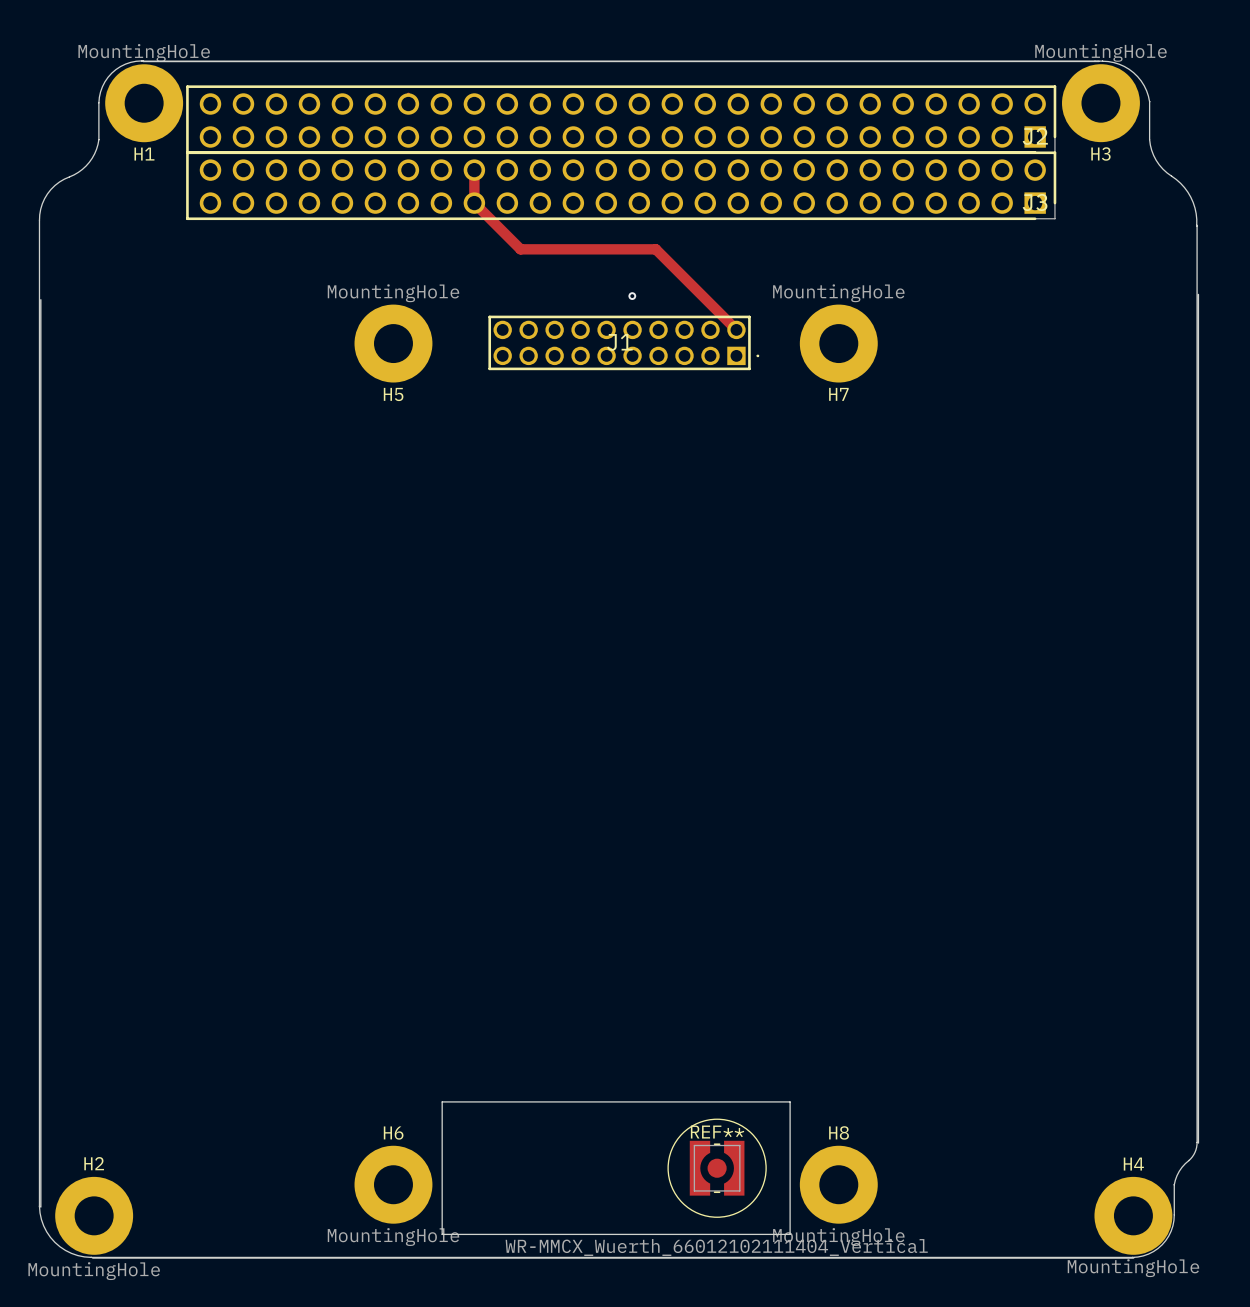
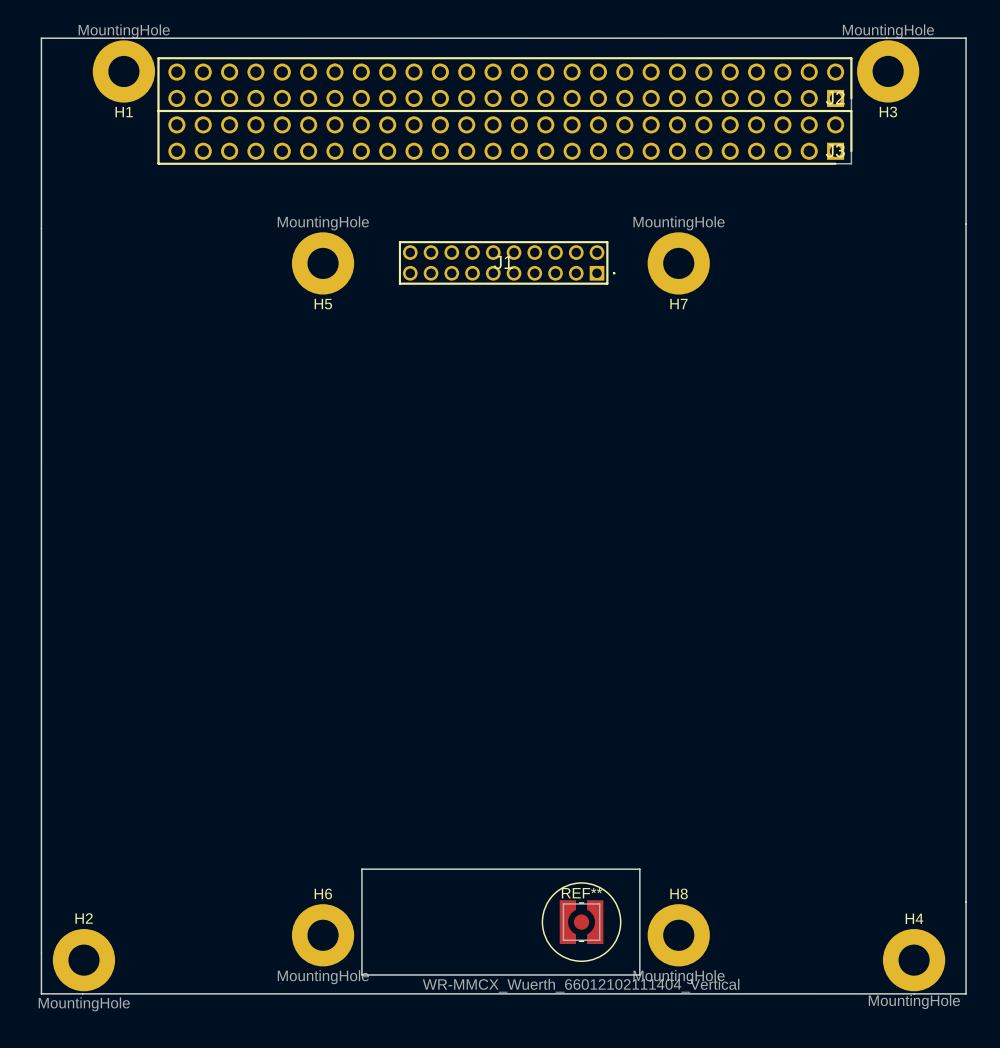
board edge: none -> (123, 38) (41, 38) (41, 228)
board edge: none -> (886, 38) (966, 38) (966, 224)
board edge: (1149, 101) (1144, 85) (1133, 72) (1119, 64) (1098, 61) (141, 60) (125, 64) (111, 73) (102, 86) (99, 97) (98, 139) (94, 153) (82, 169) (59, 182) (50, 189) (42, 203) (39, 214) (39, 1206) (43, 1225) (54, 1242) (71, 1253) (91, 1257) (1132, 1257) (1148, 1254) (1162, 1244) (1172, 1225) (1175, 1180) (1182, 1167) (1193, 1154) (1197, 1142) (1197, 226) (1194, 208) (1187, 192) (1159, 164) (1151, 150) (1149, 139) (1149, 101) -> none
track: (474, 170) (474, 203) (520, 249) (655, 249) (736, 329) -> none
via: (632, 296) -> none
board edge: none -> (966, 902) (966, 993) (914, 993)
board edge: none -> (41, 953) (41, 993) (82, 993)

